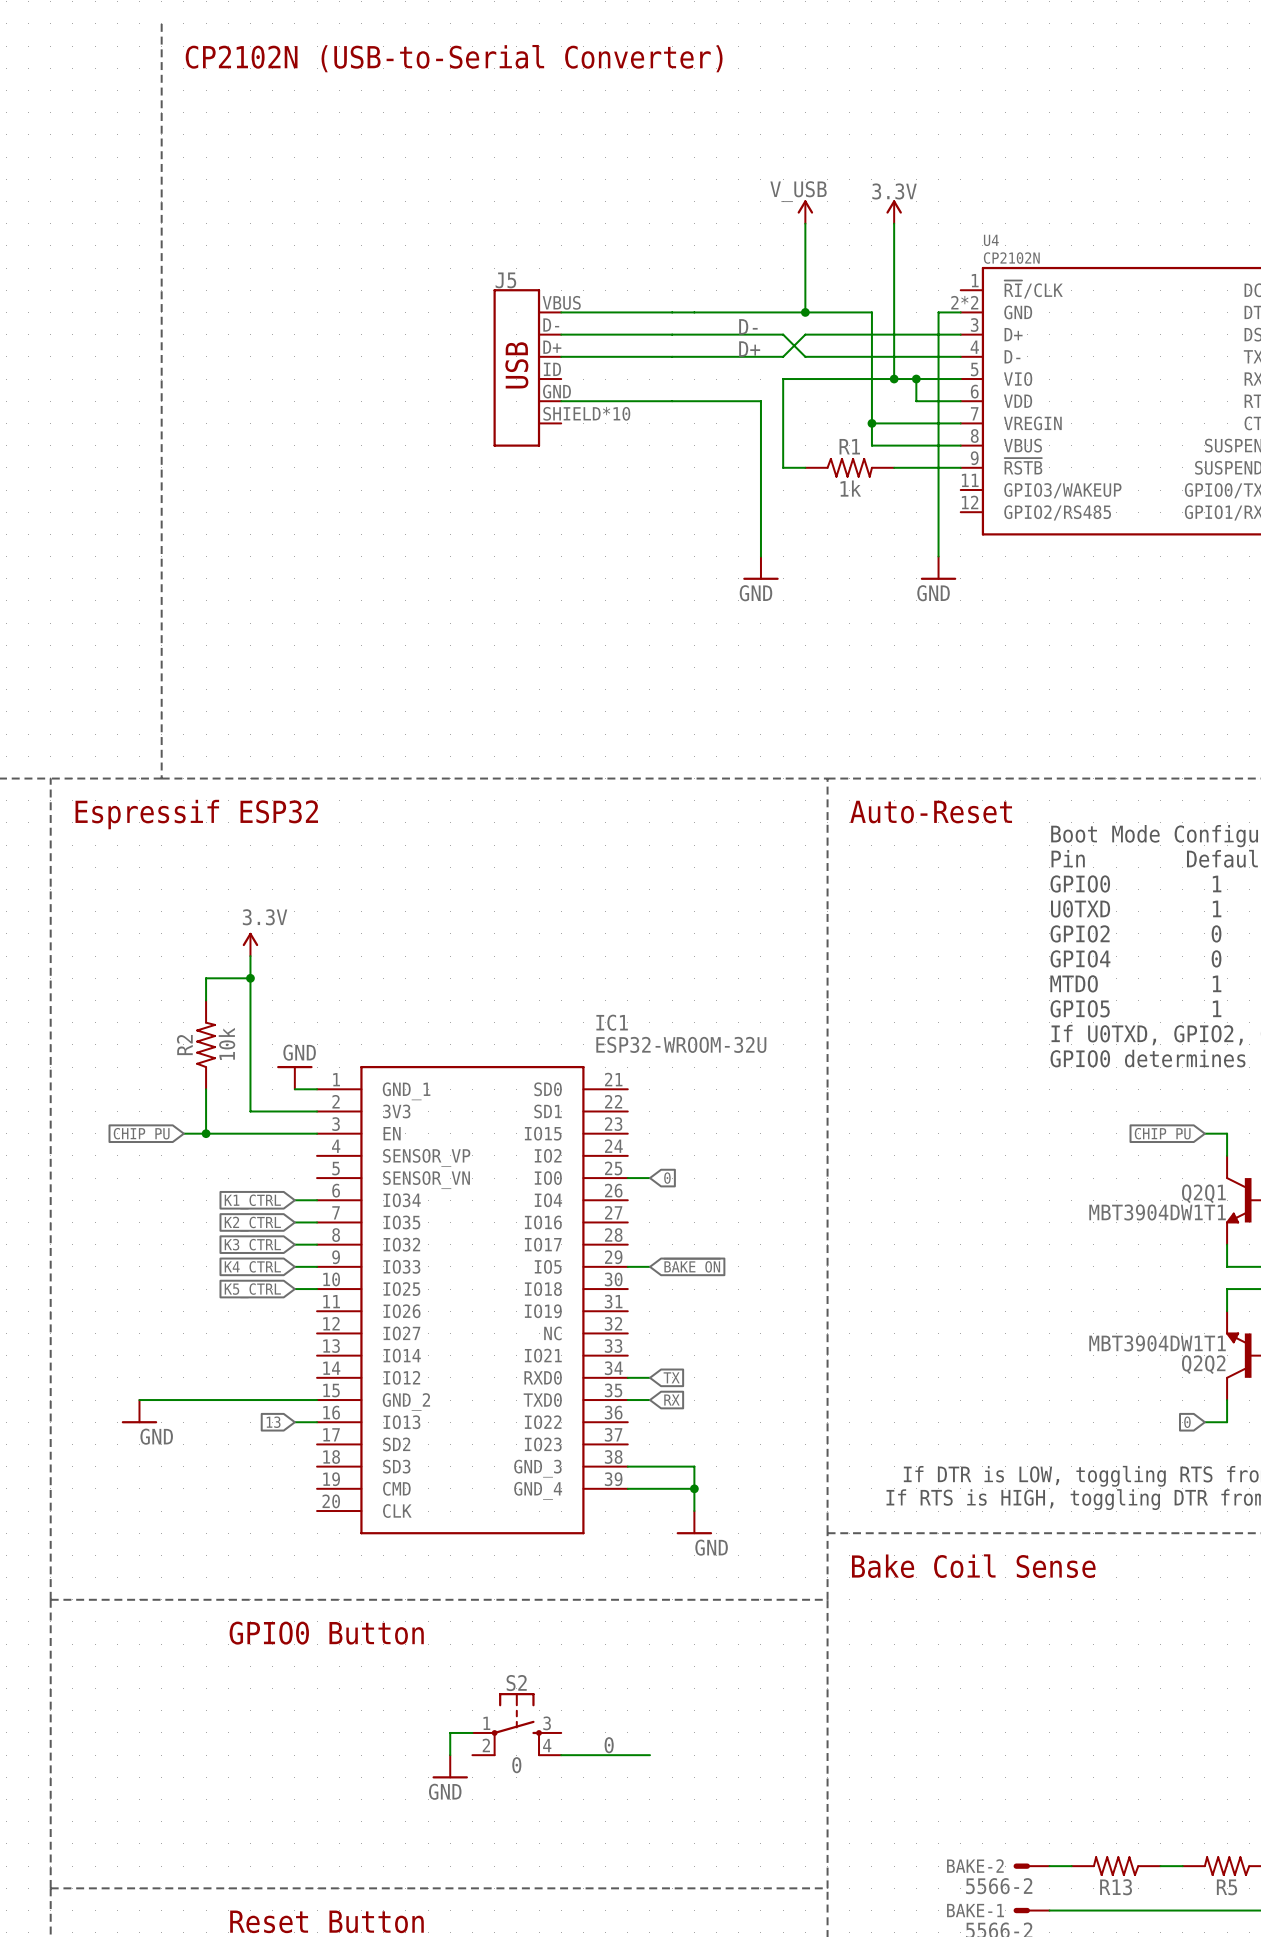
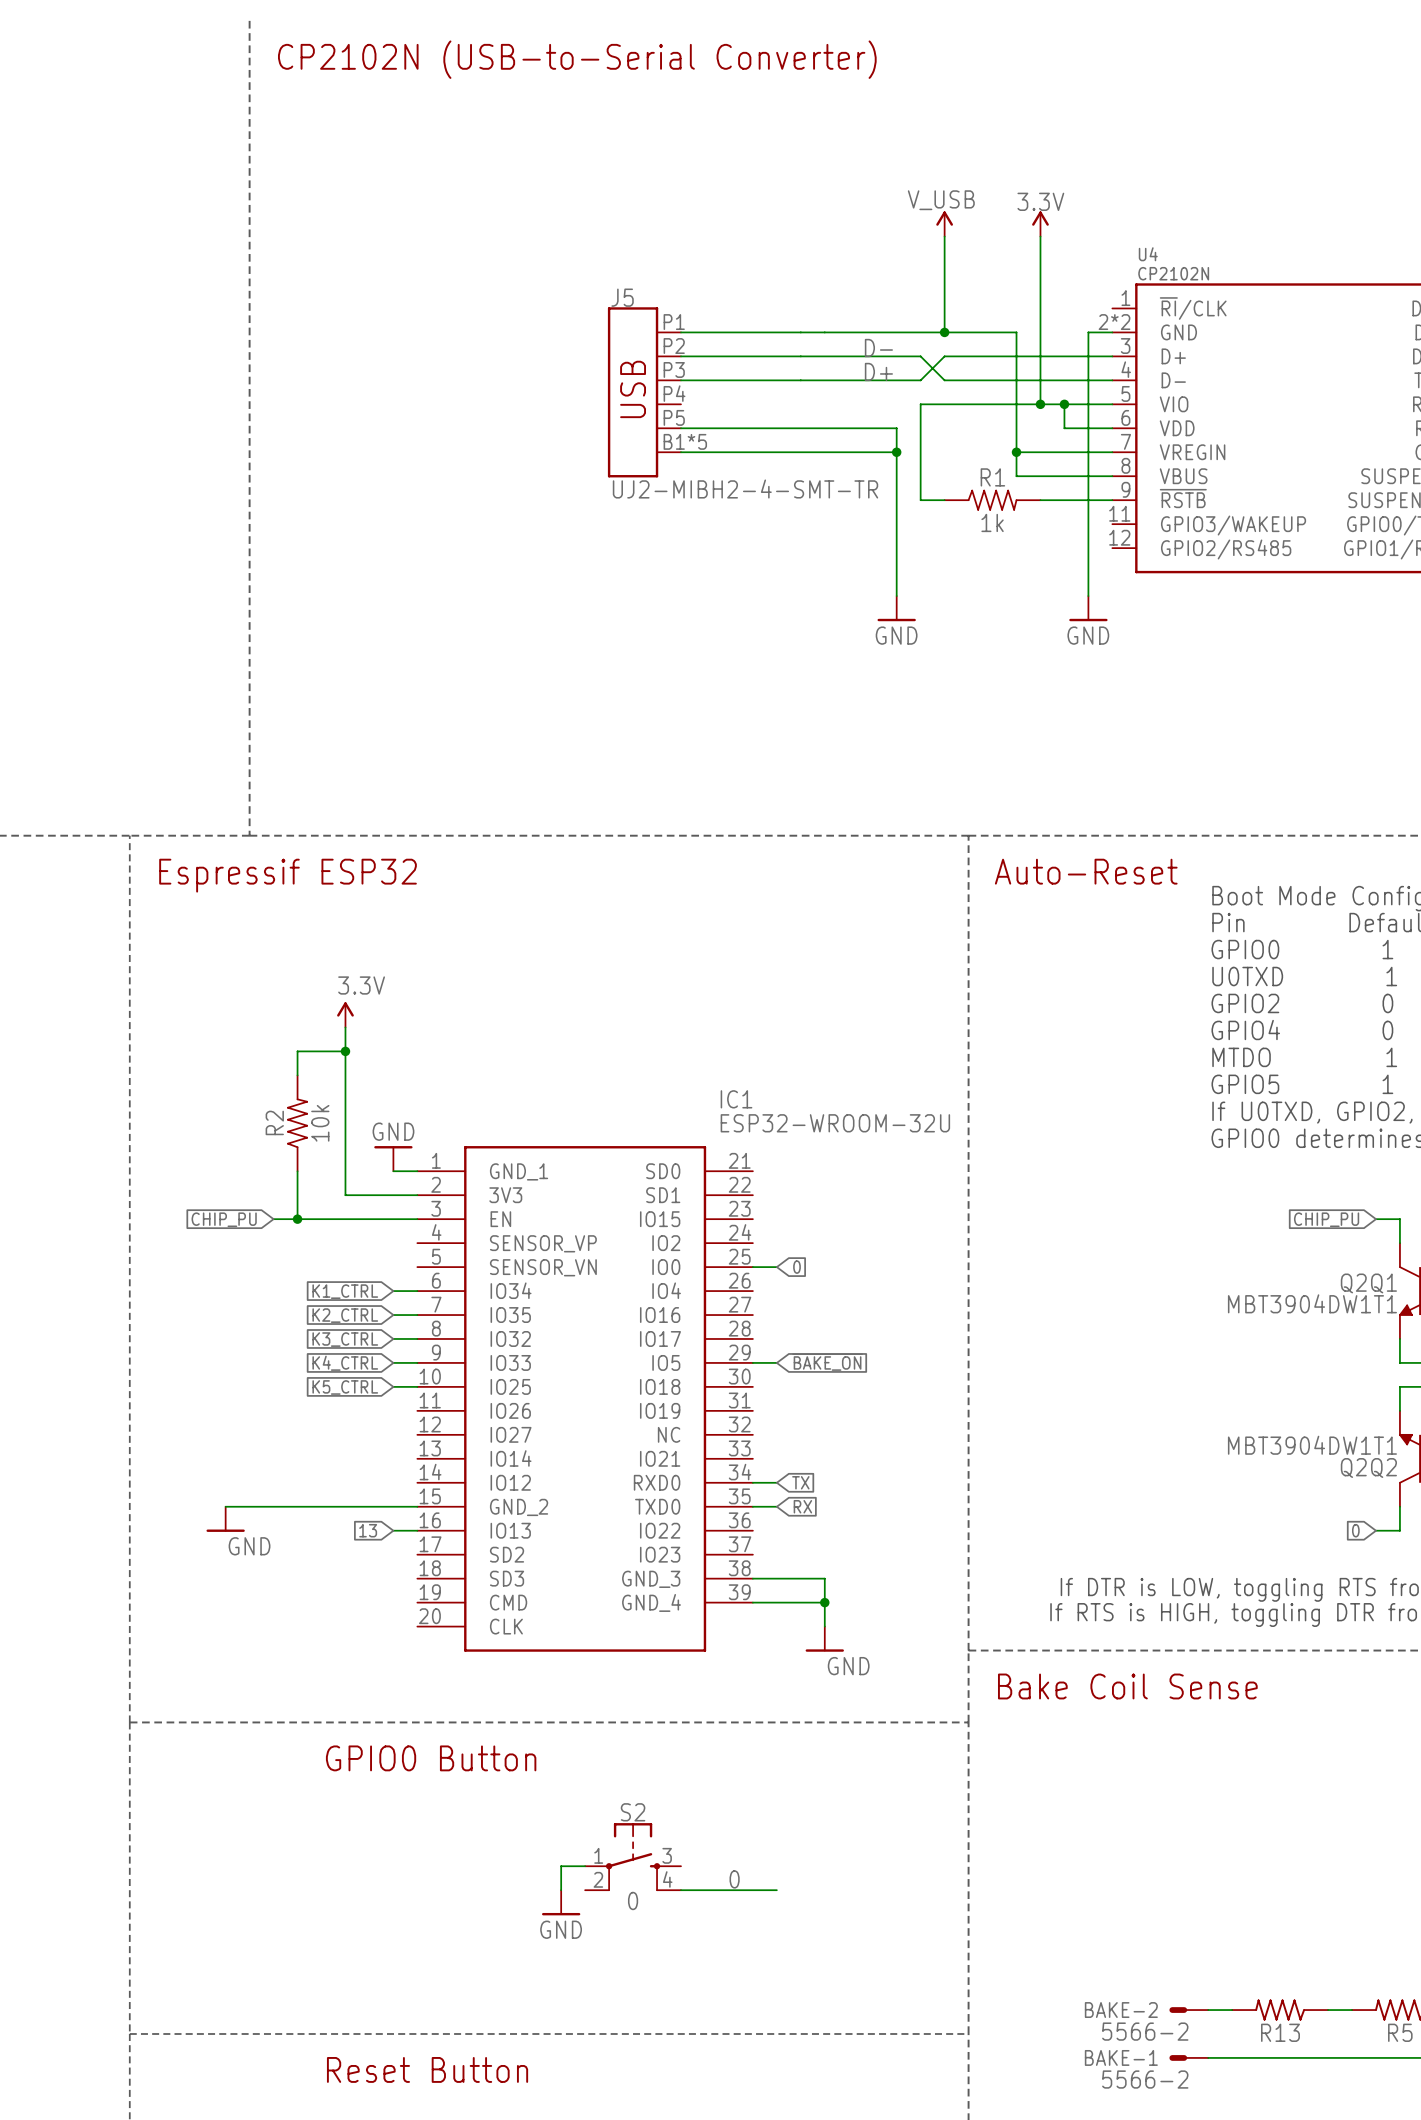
J5 pin number: VBUS (561, 302) -> P1 (674, 322)
J5 pin number: D- (551, 325) -> P2 (674, 346)
J5 pin number: D+ (552, 347) -> P3 (674, 369)
J5 pin number: ID (552, 369) -> P4 (674, 393)
J5 pin number: GND (556, 391) -> P5 (674, 417)
J5 pin number: SHIELD*10 (586, 413) -> B1*5 (685, 441)
wire: none -> (680, 452) (896, 452)
junction: none -> (896, 452)
J5 value: none -> UJ2-MIBH2-4-SMT-TR (745, 489)

